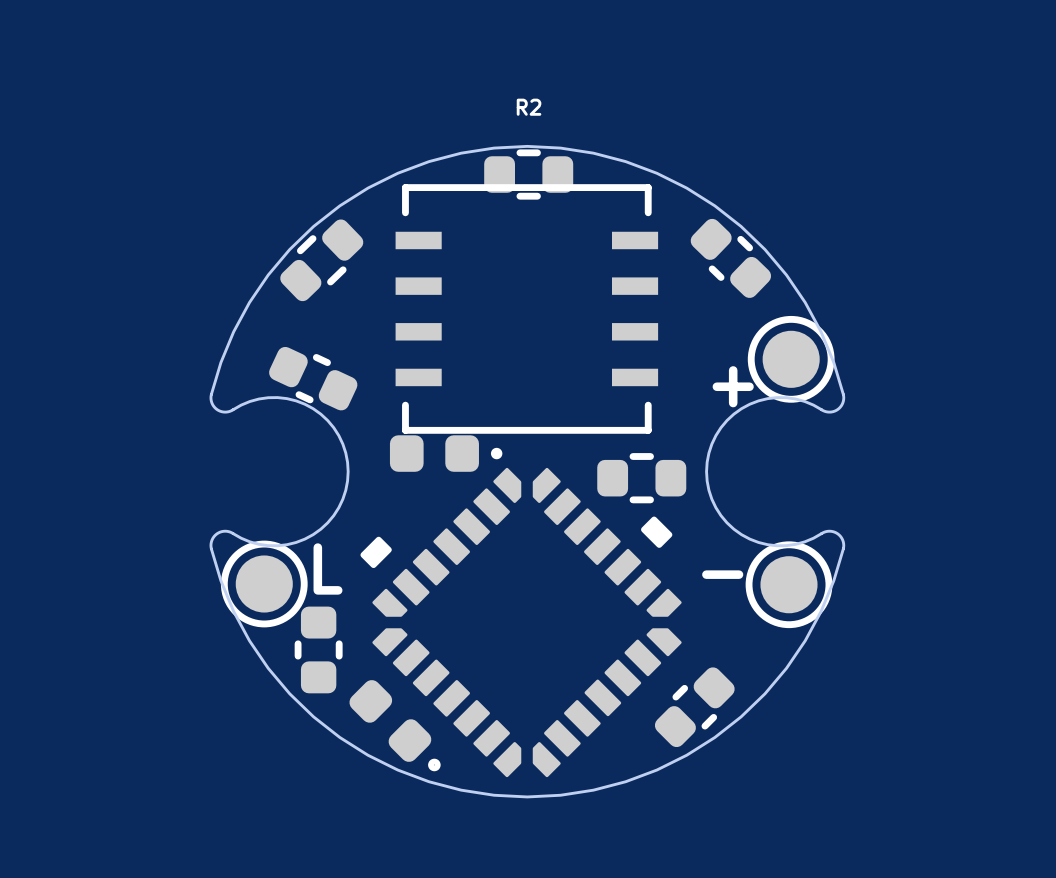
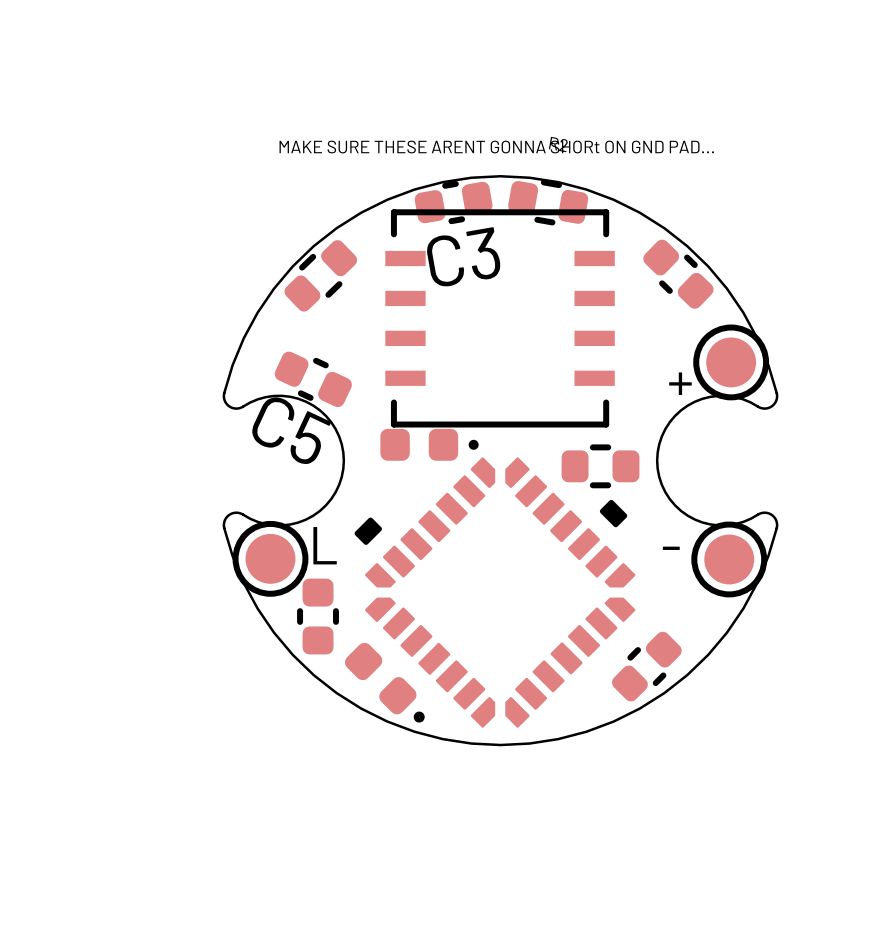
text: none -> MAKE SURE THESE ARENT GONNA SHORt ON GND PAD... (496, 147)
R2 rotation: 0° (528, 174) -> 10° clockwise (548, 202)
C3: none -> (453, 202)
C5 name: none -> C5 (291, 430)

